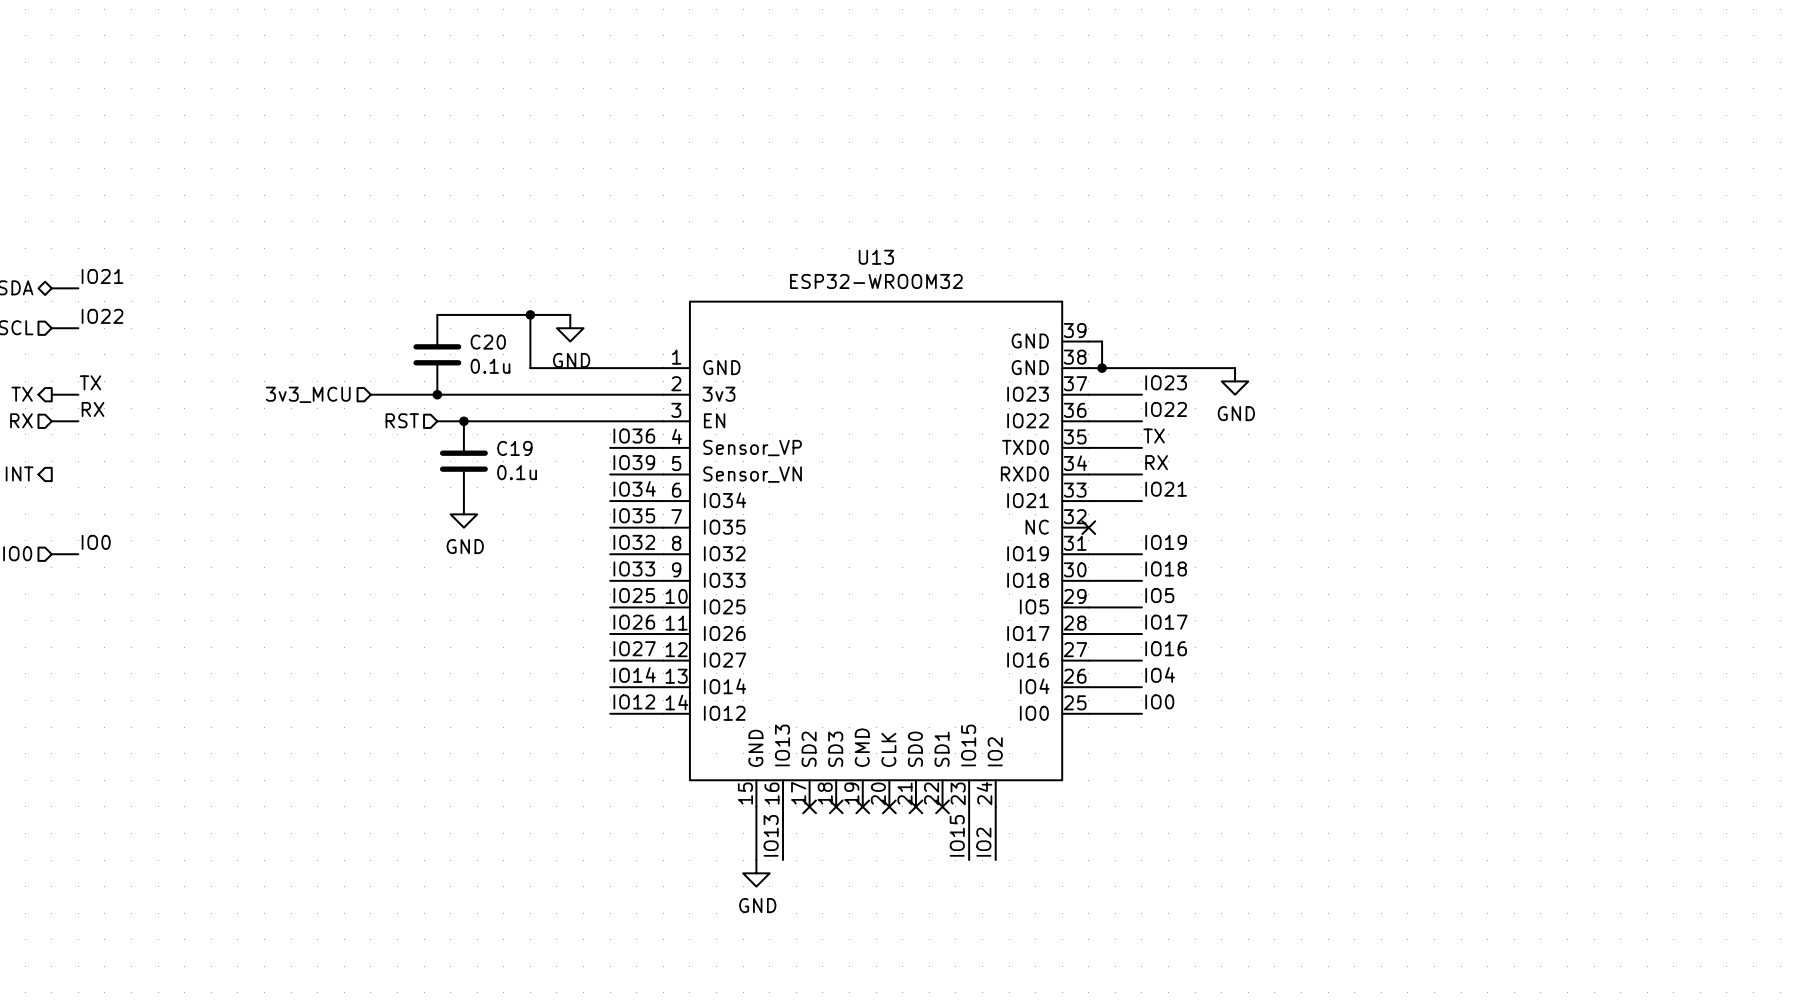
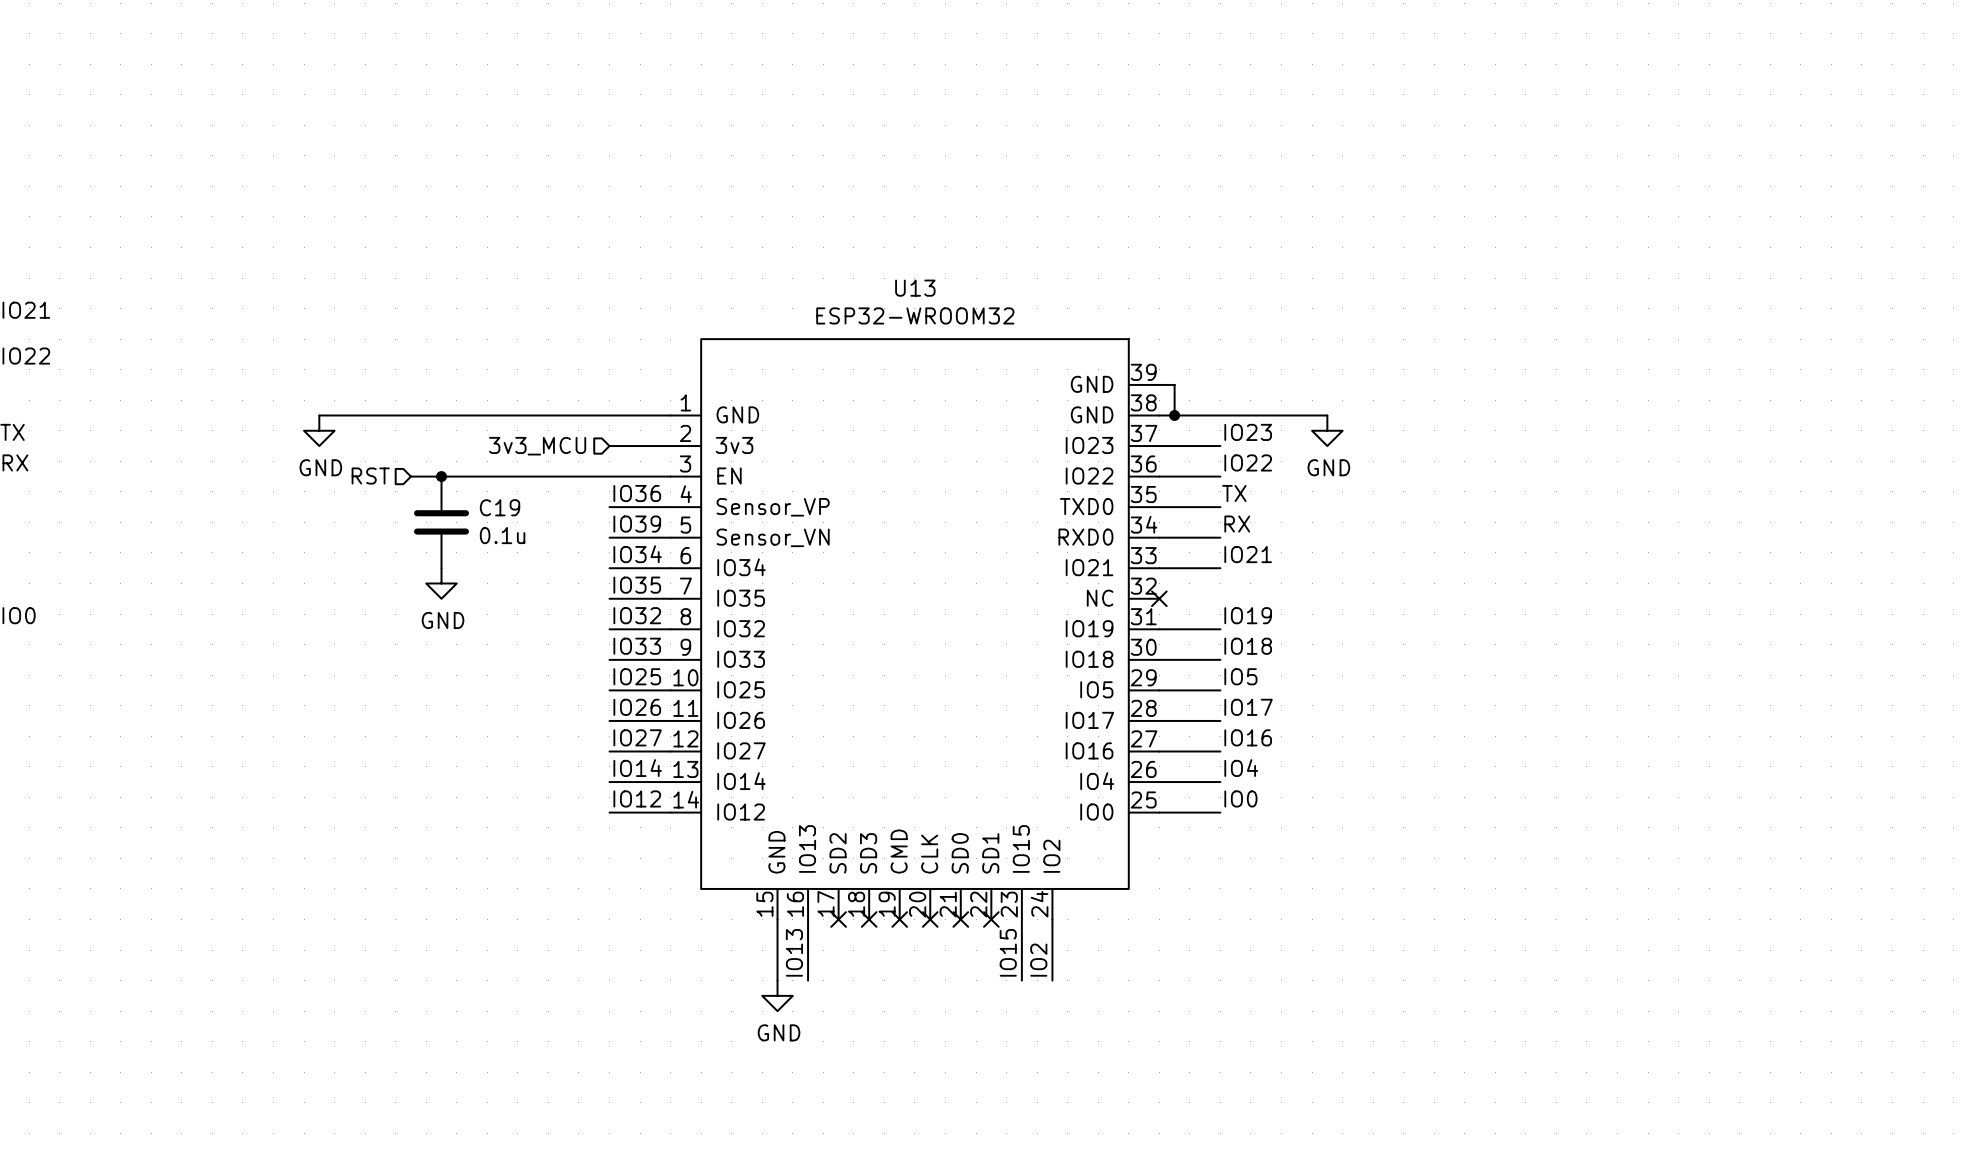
wire: (437, 314) (570, 314) -> none
wire: (530, 314) (530, 368) -> (319, 415) (517, 415)
junction: (530, 314) -> none
power symbol position: GND (570, 328) -> GND (319, 430)
C20: 0.1u (437, 354) -> none
hierarchical label position: 3v3_MCU (308, 394) -> 3v3_MCU (537, 446)
wire: (370, 394) (610, 394) -> none
junction: (437, 394) -> none

